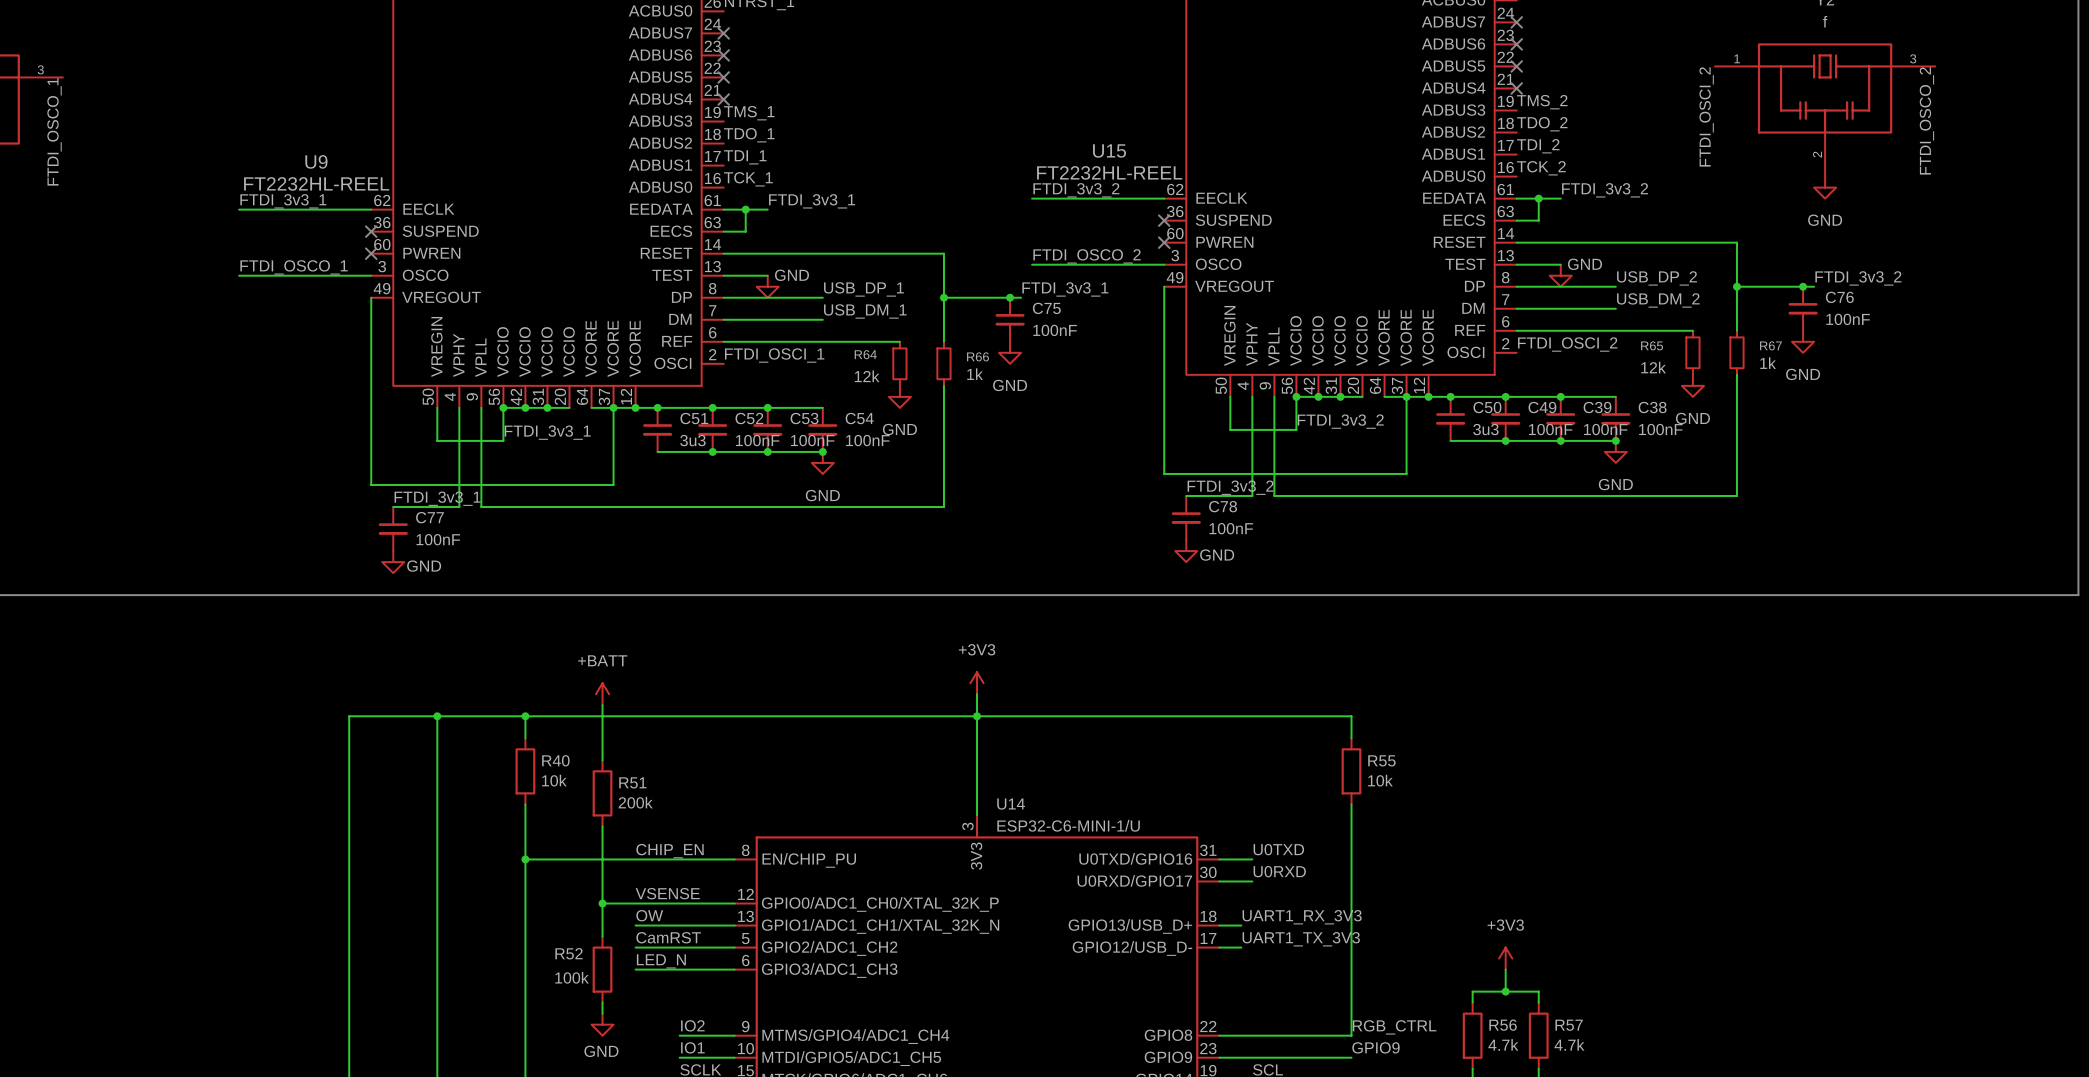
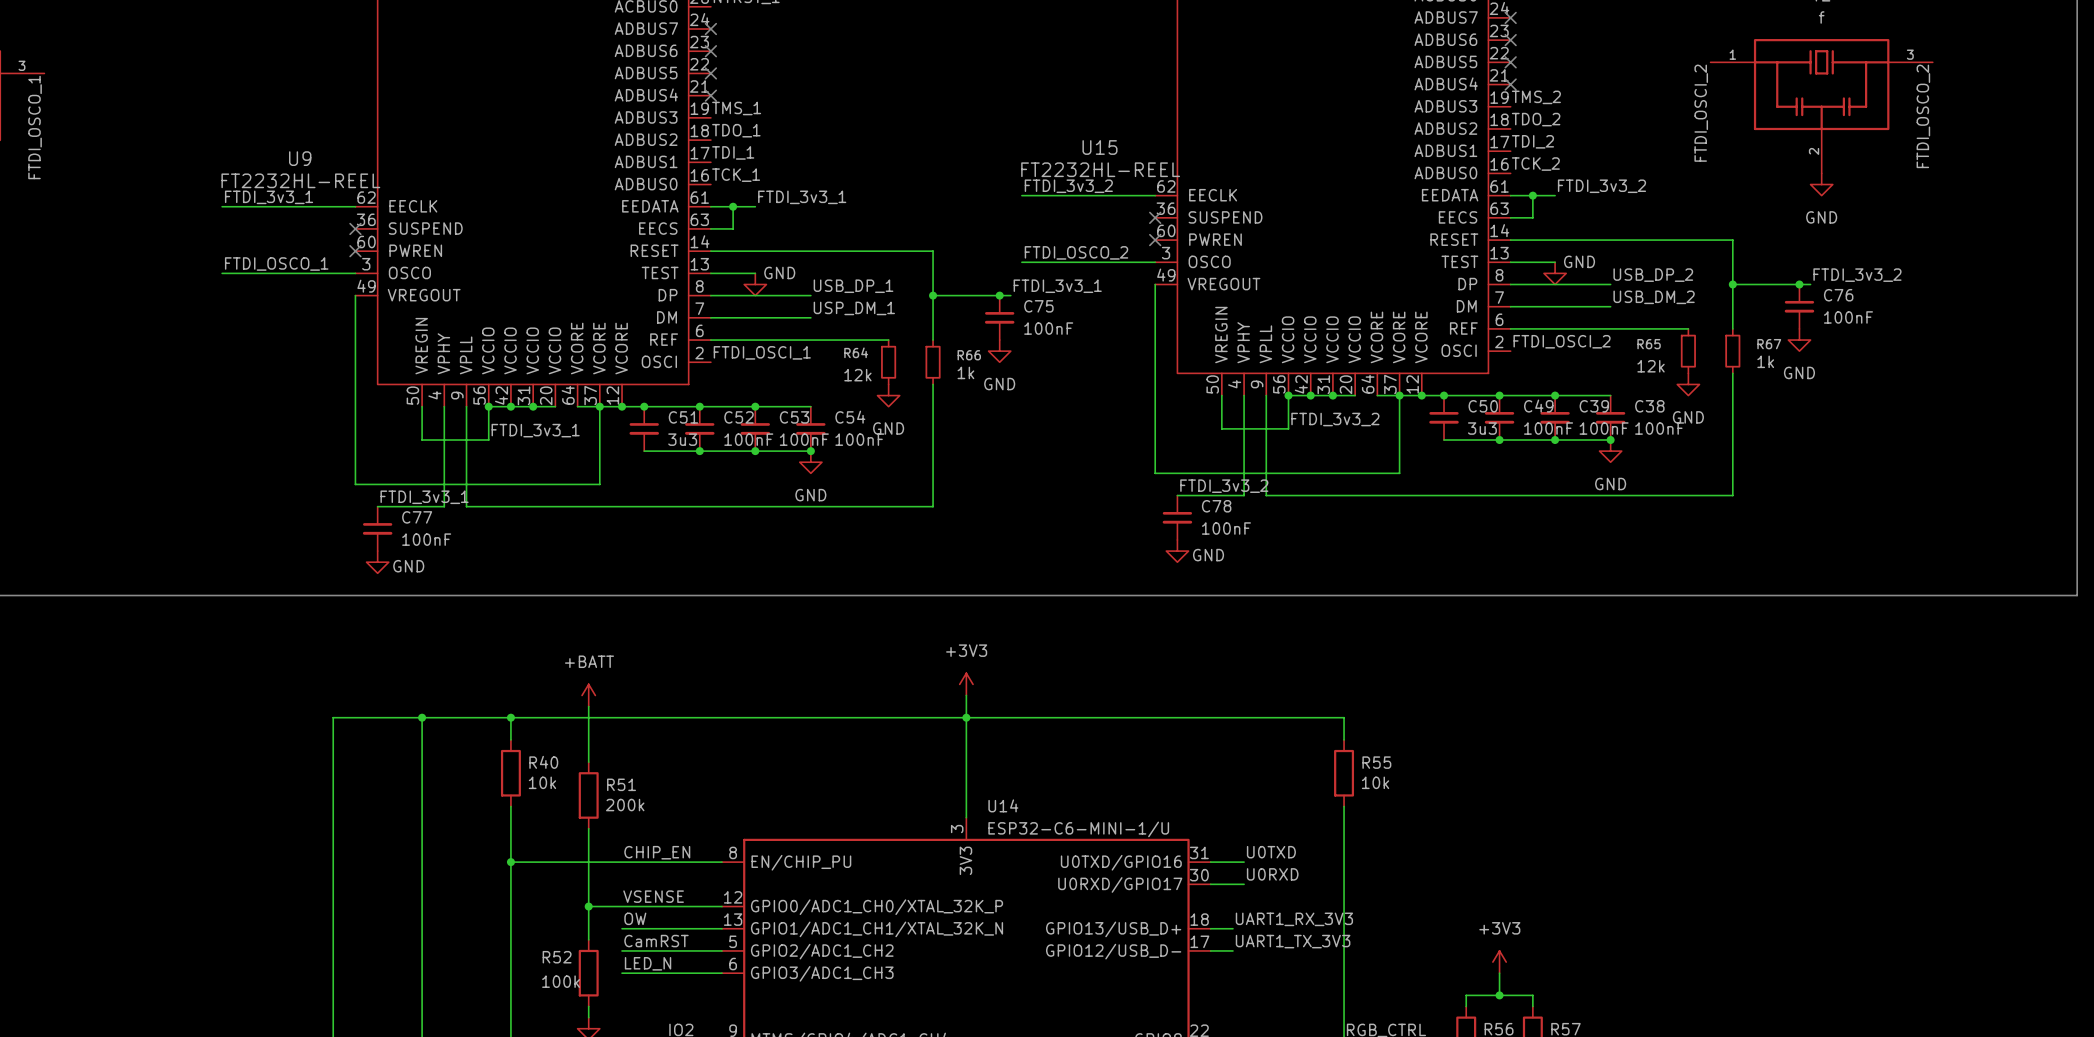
label: USB_DM_1 (865, 311) -> USP_DM_1 (854, 308)

